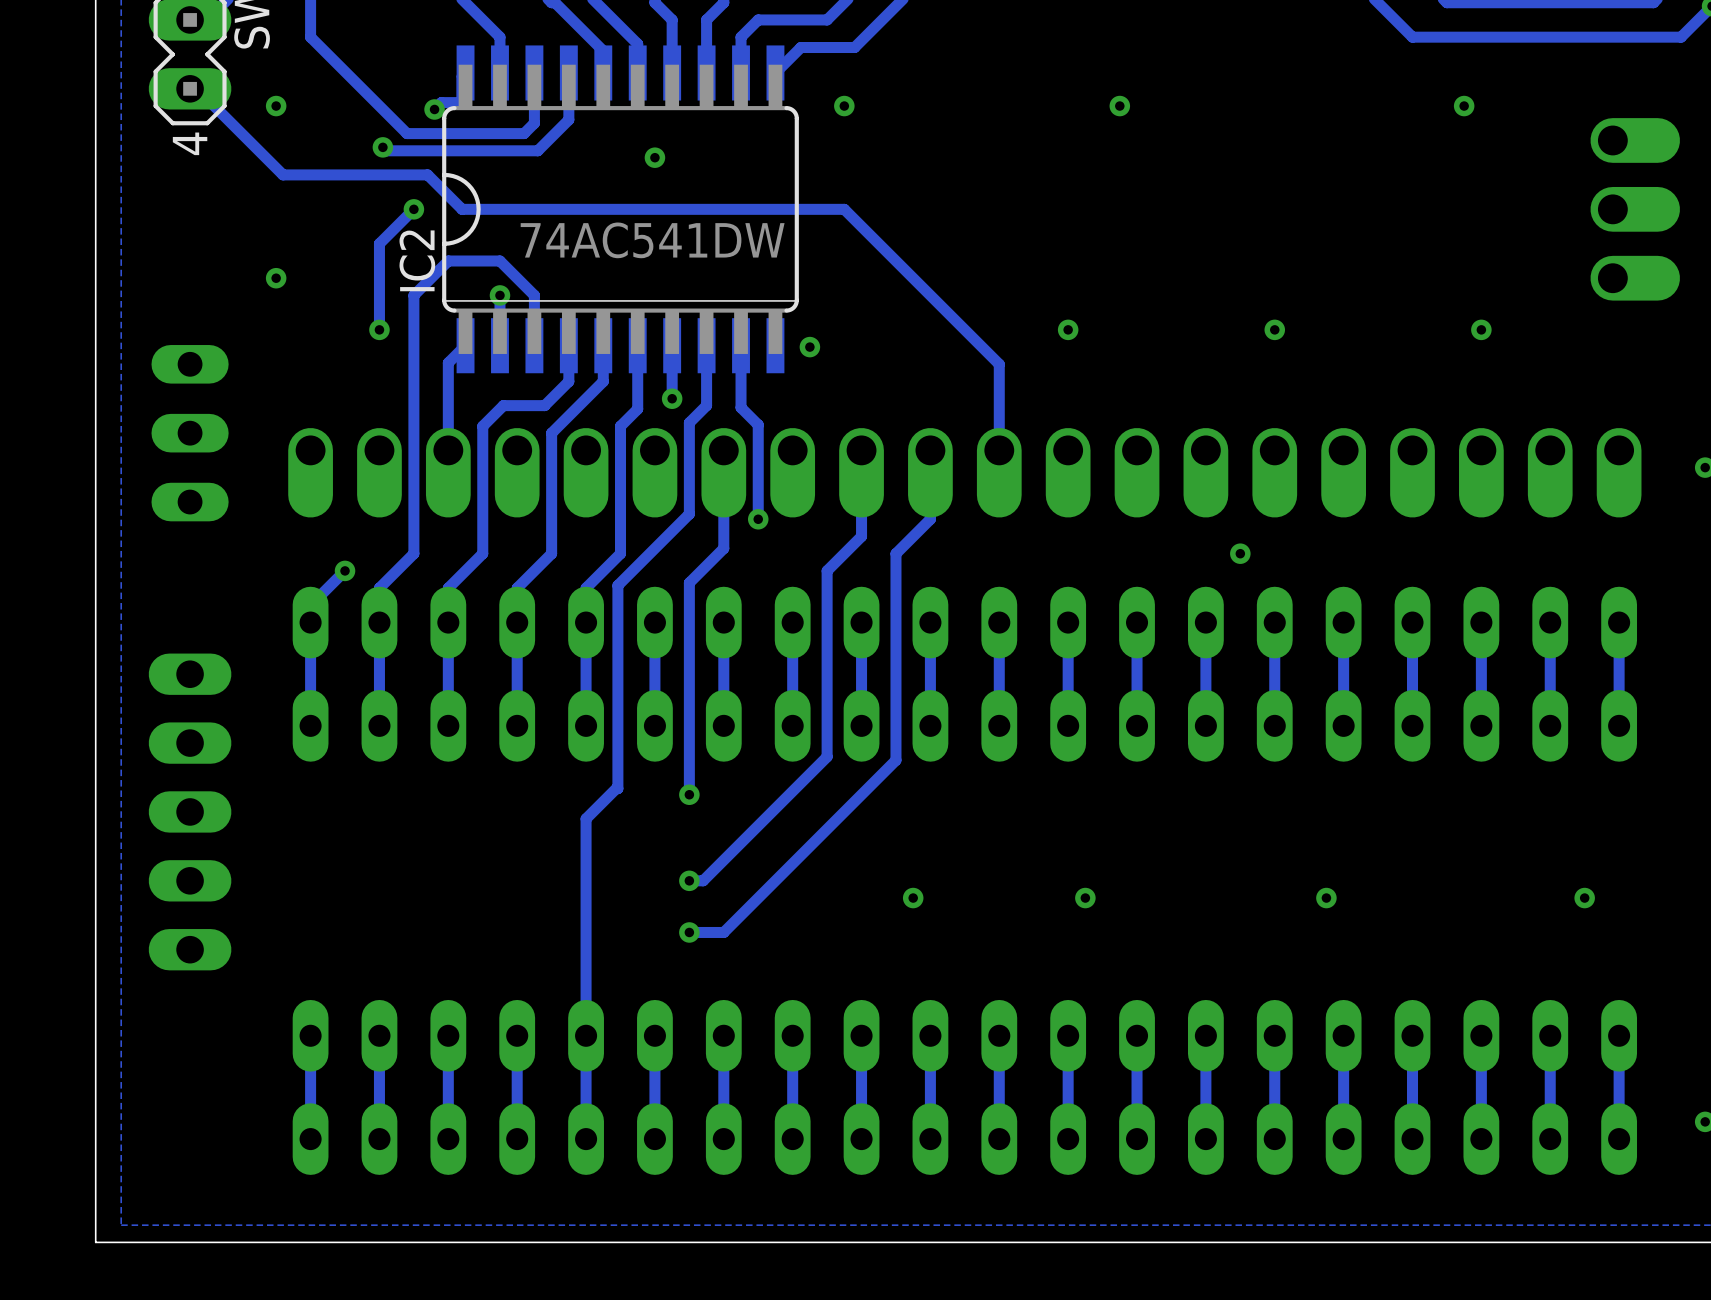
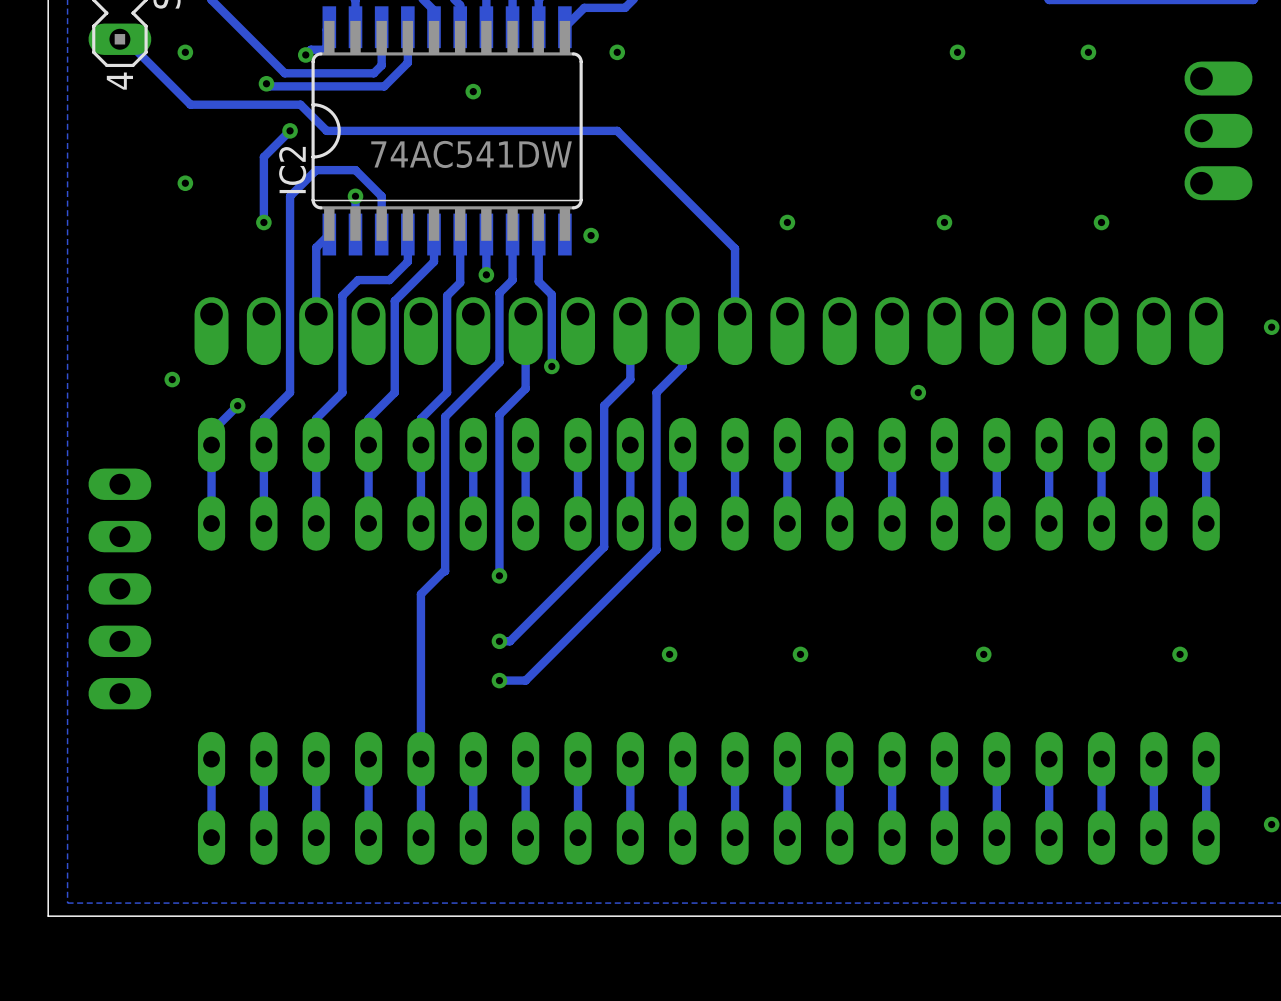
via: (1119, 106) -> none
via: none -> (957, 52)
part: (190, 433) -> none
via: none -> (172, 379)

